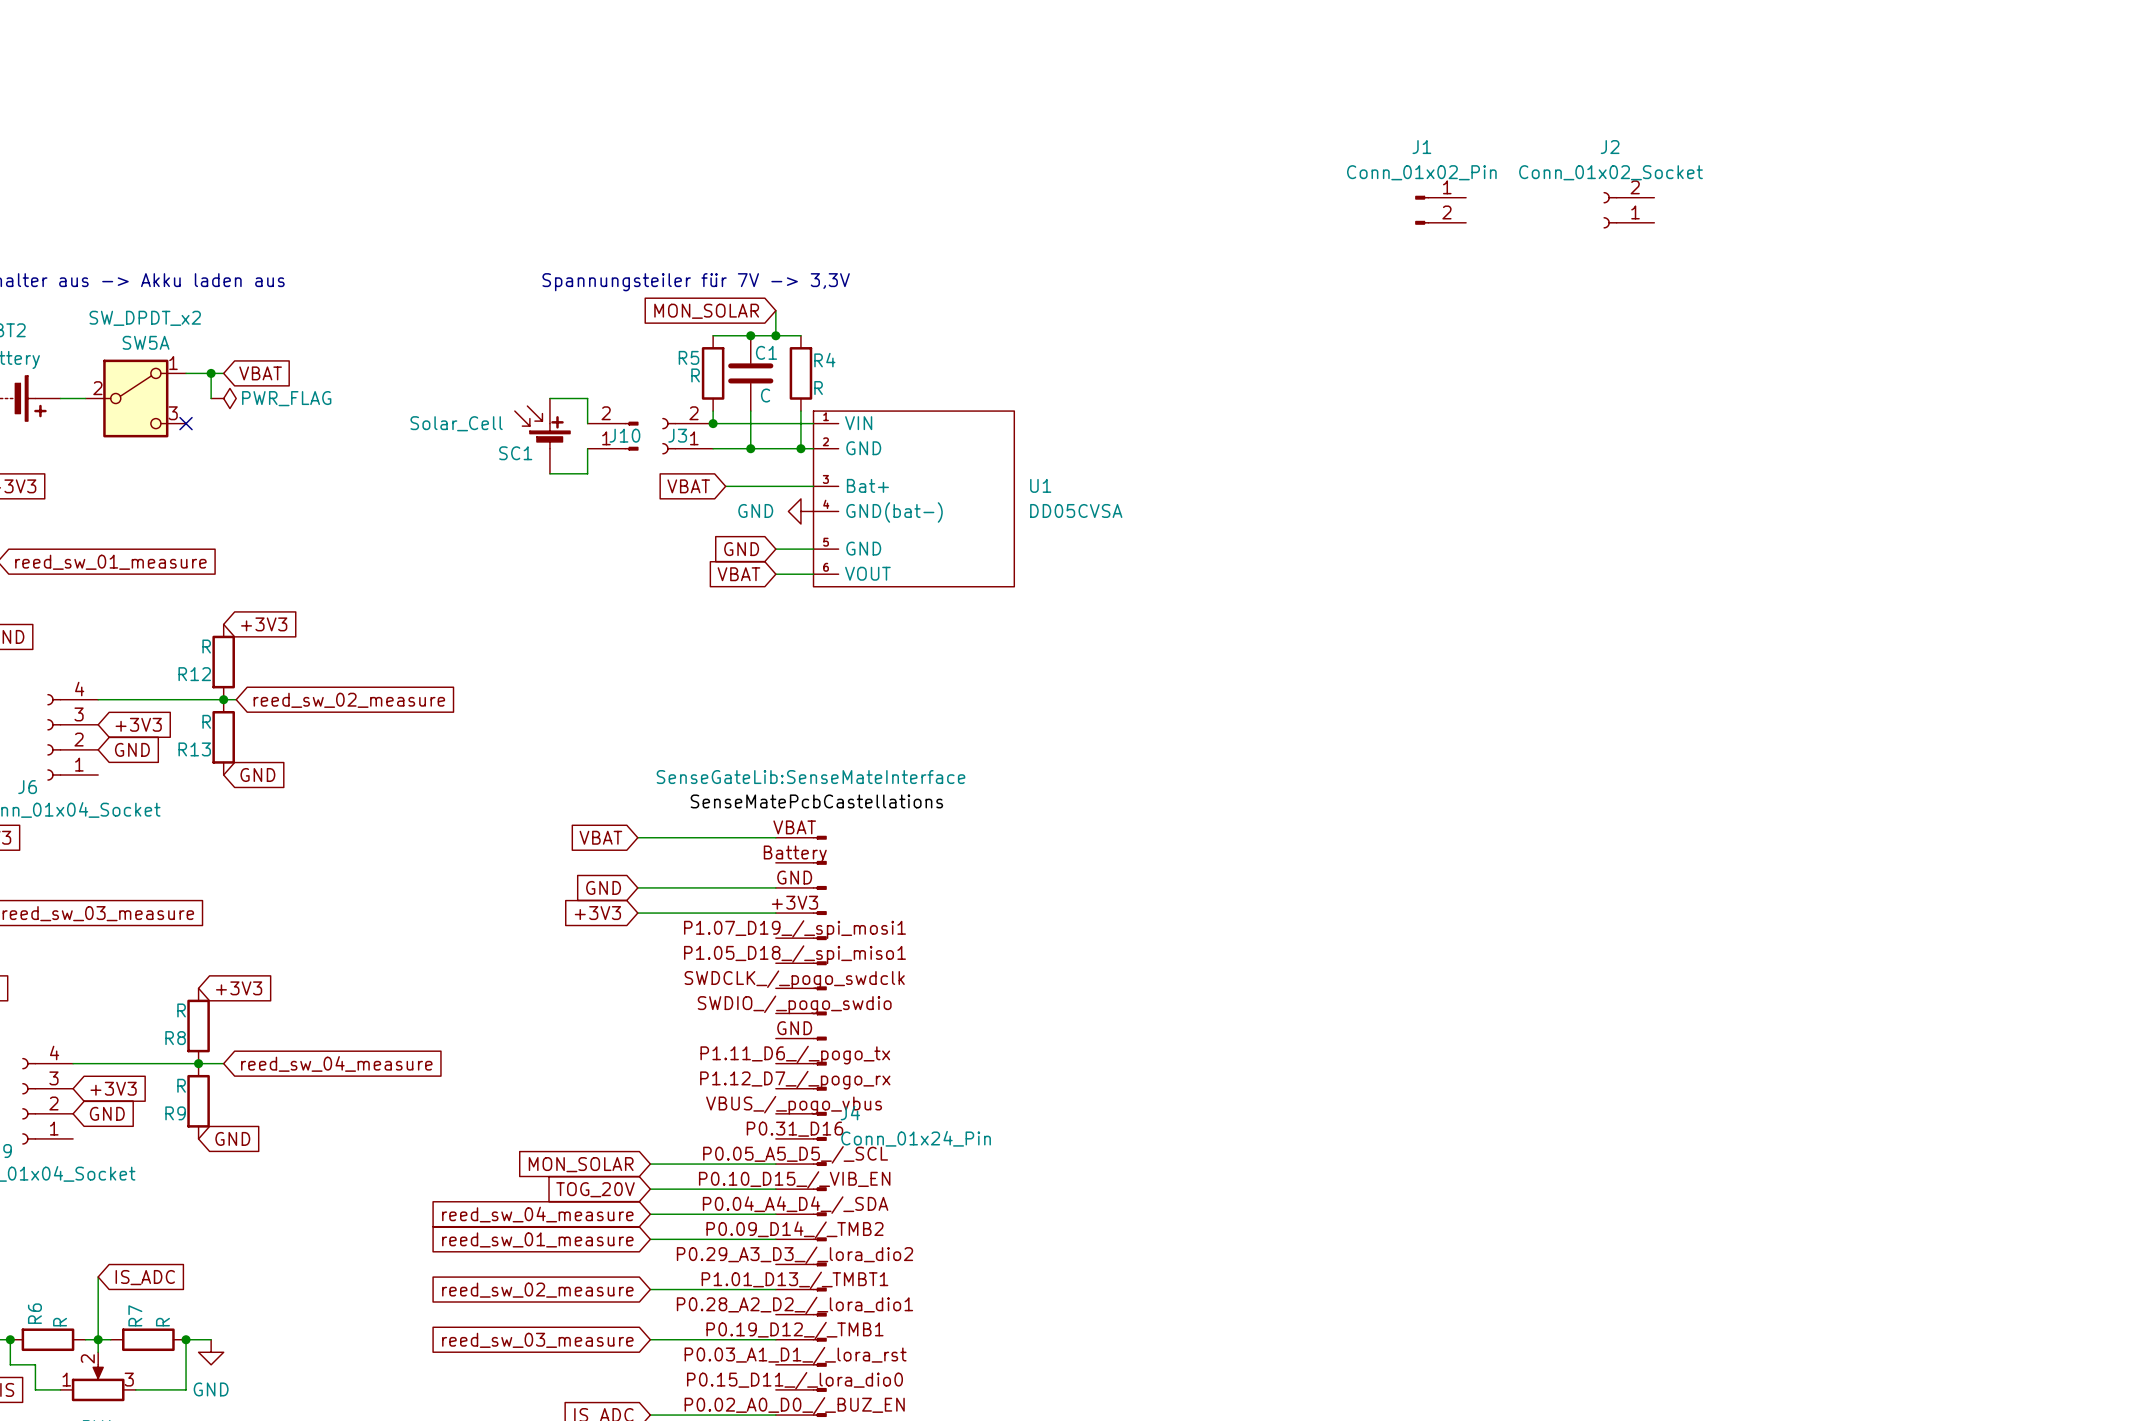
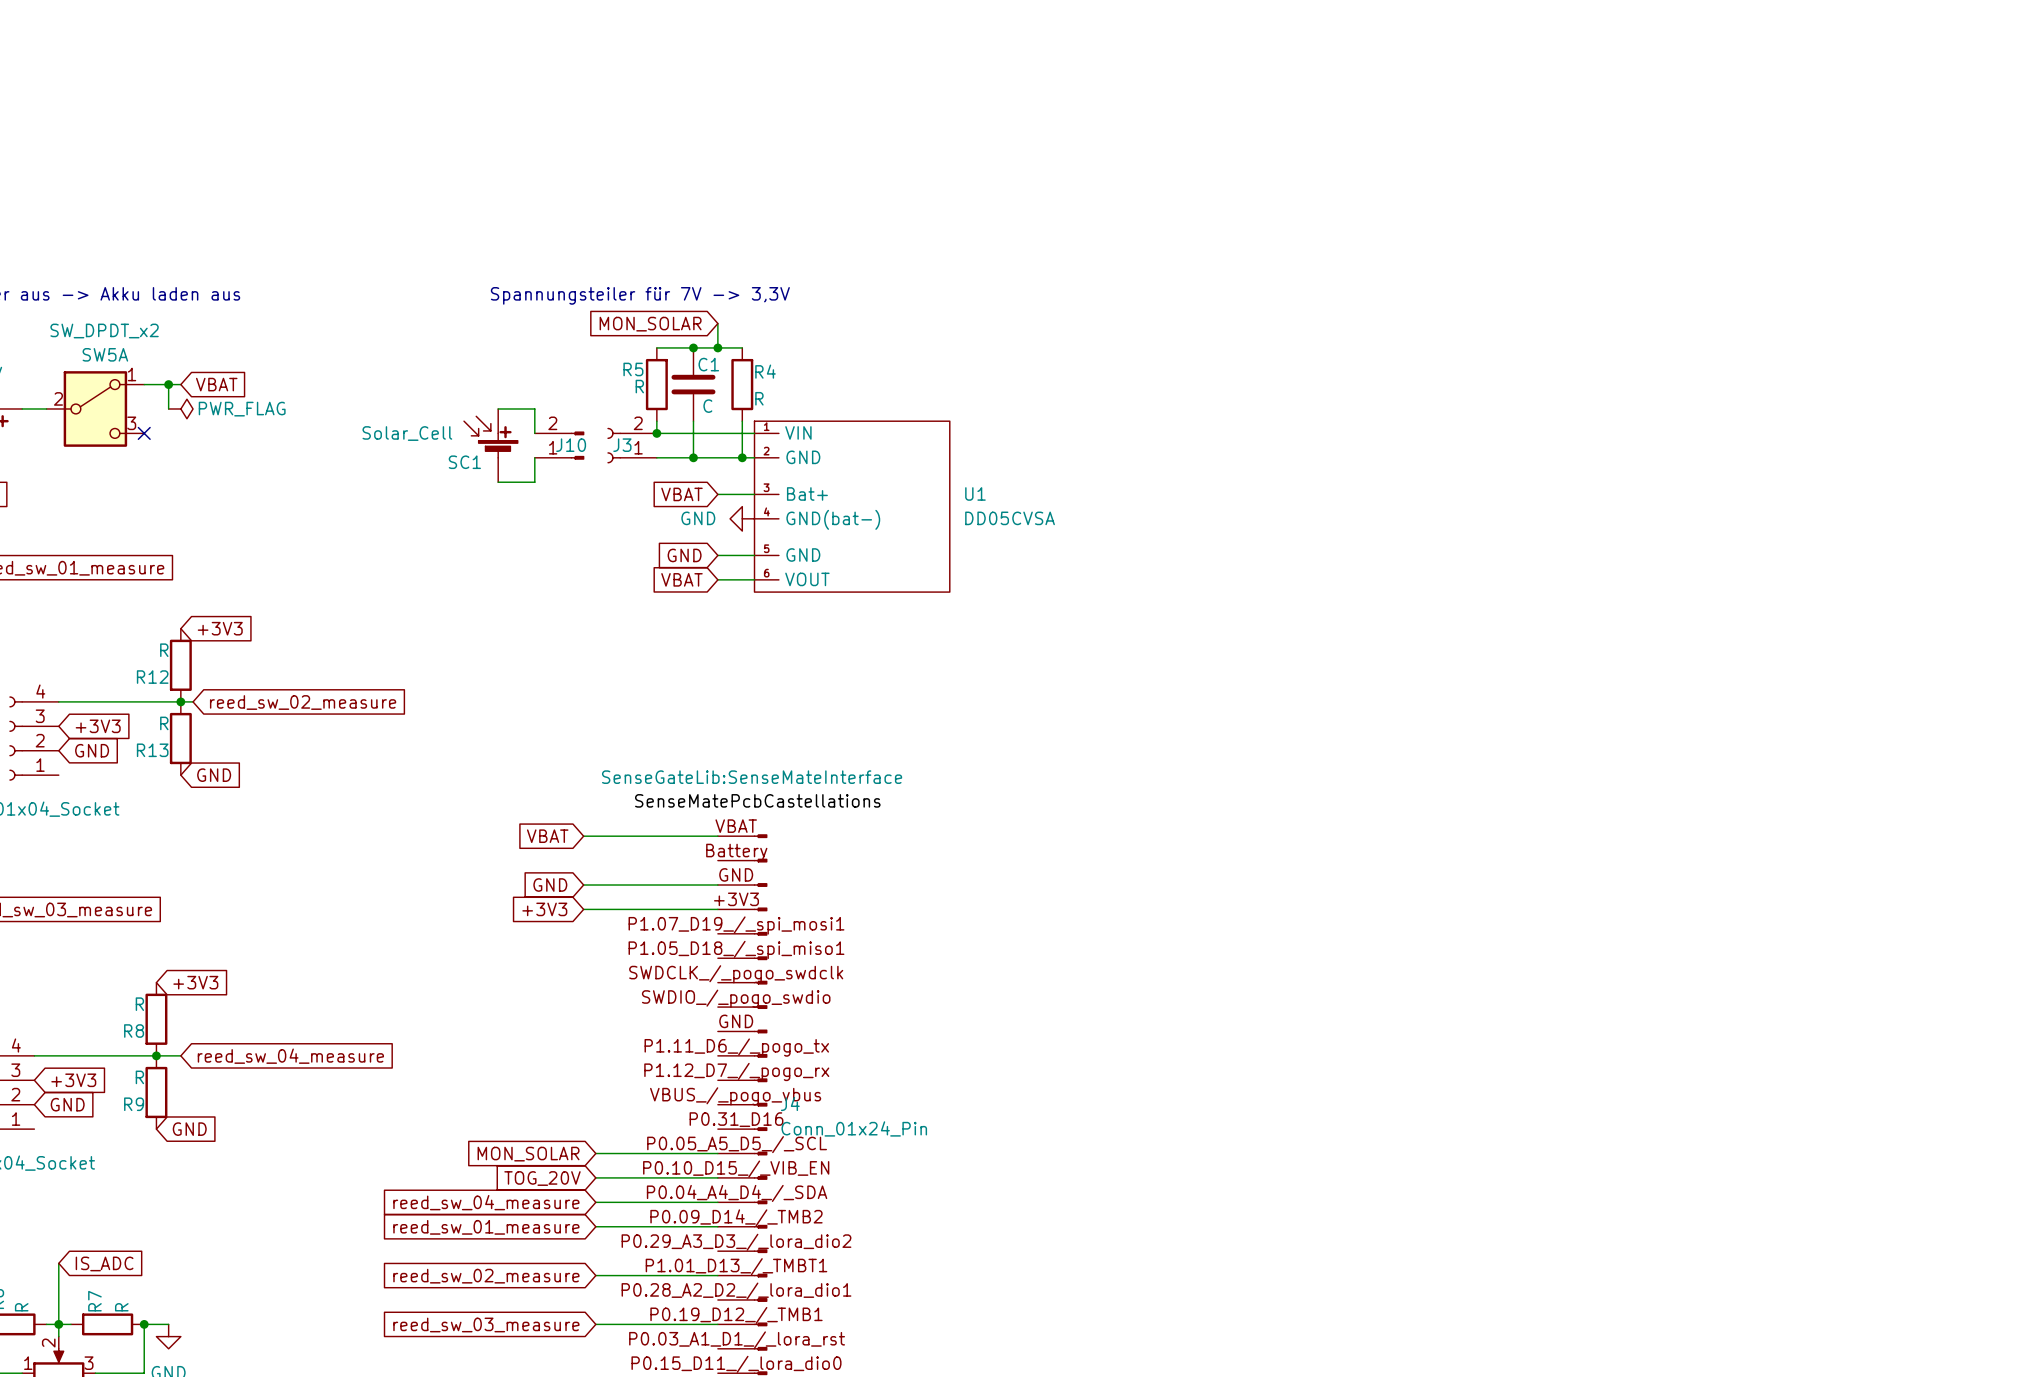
J1: Conn_01x02_Pin (1440, 210) -> none
J2: Conn_01x02_Socket (1628, 210) -> none
global label position: VBAT (688, 486) -> VBAT (681, 494)
wire: (725, 486) (775, 486) -> none

